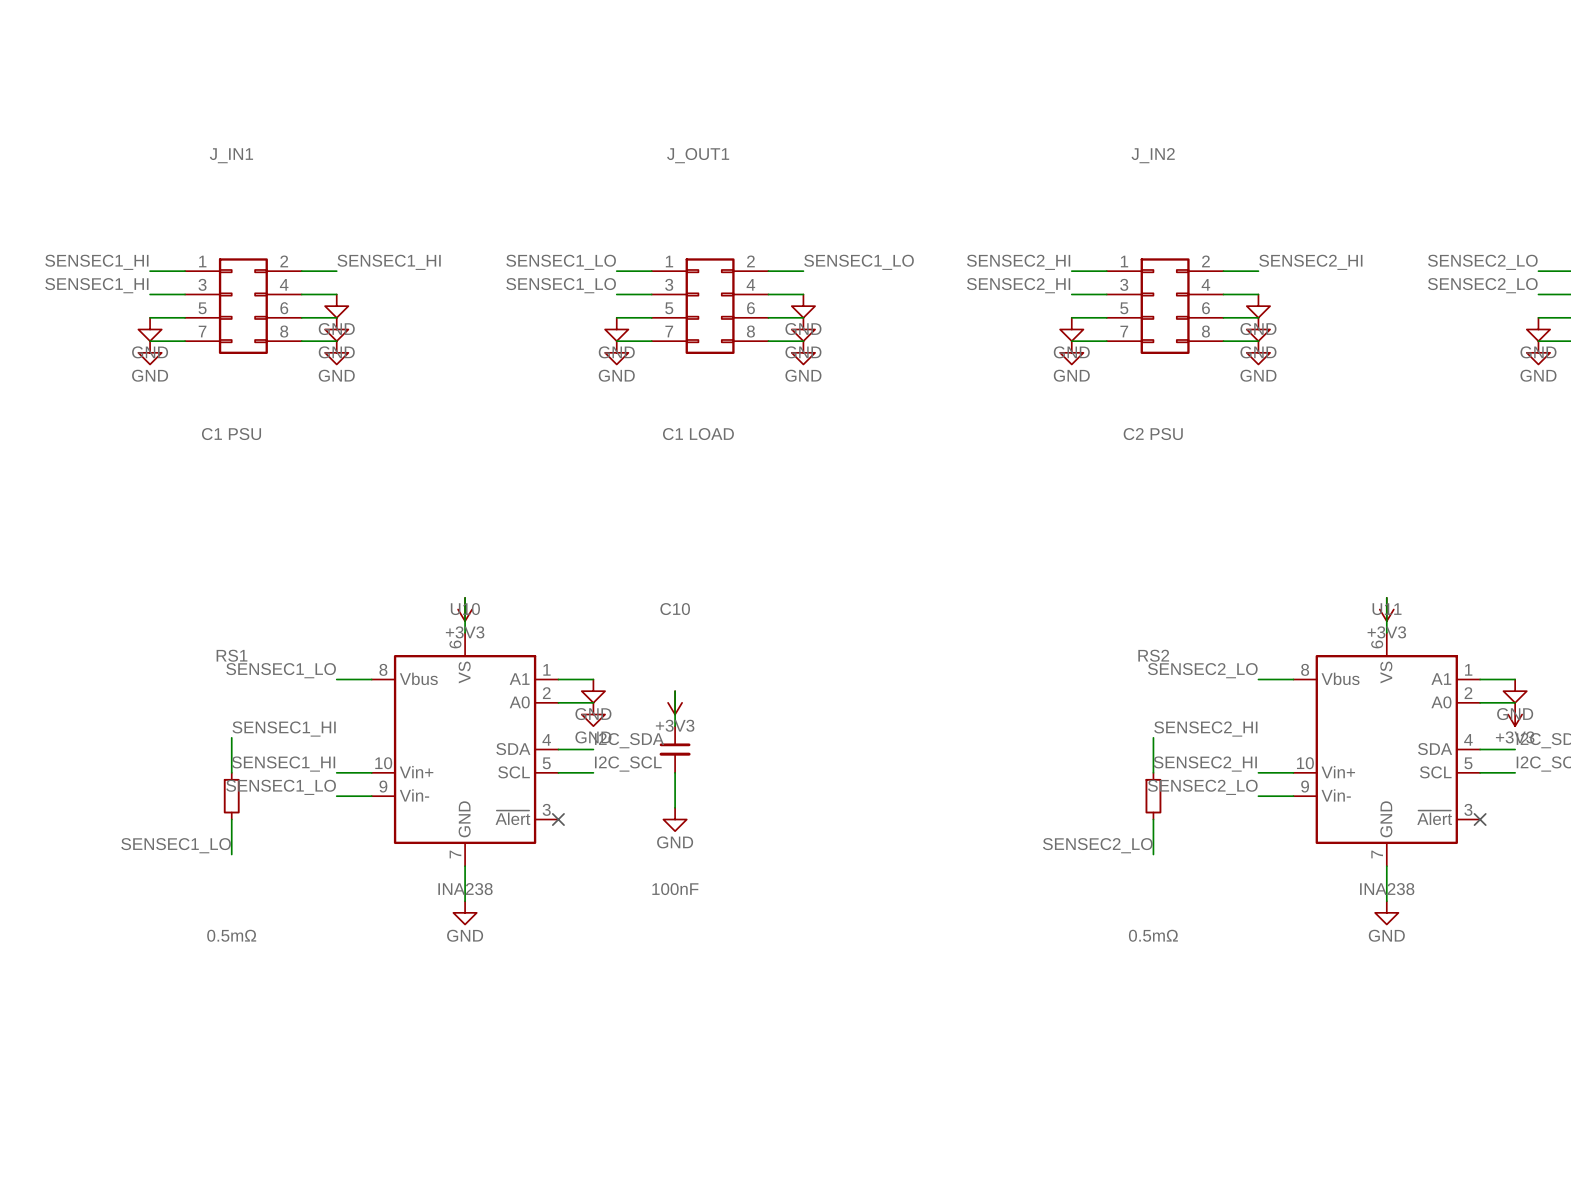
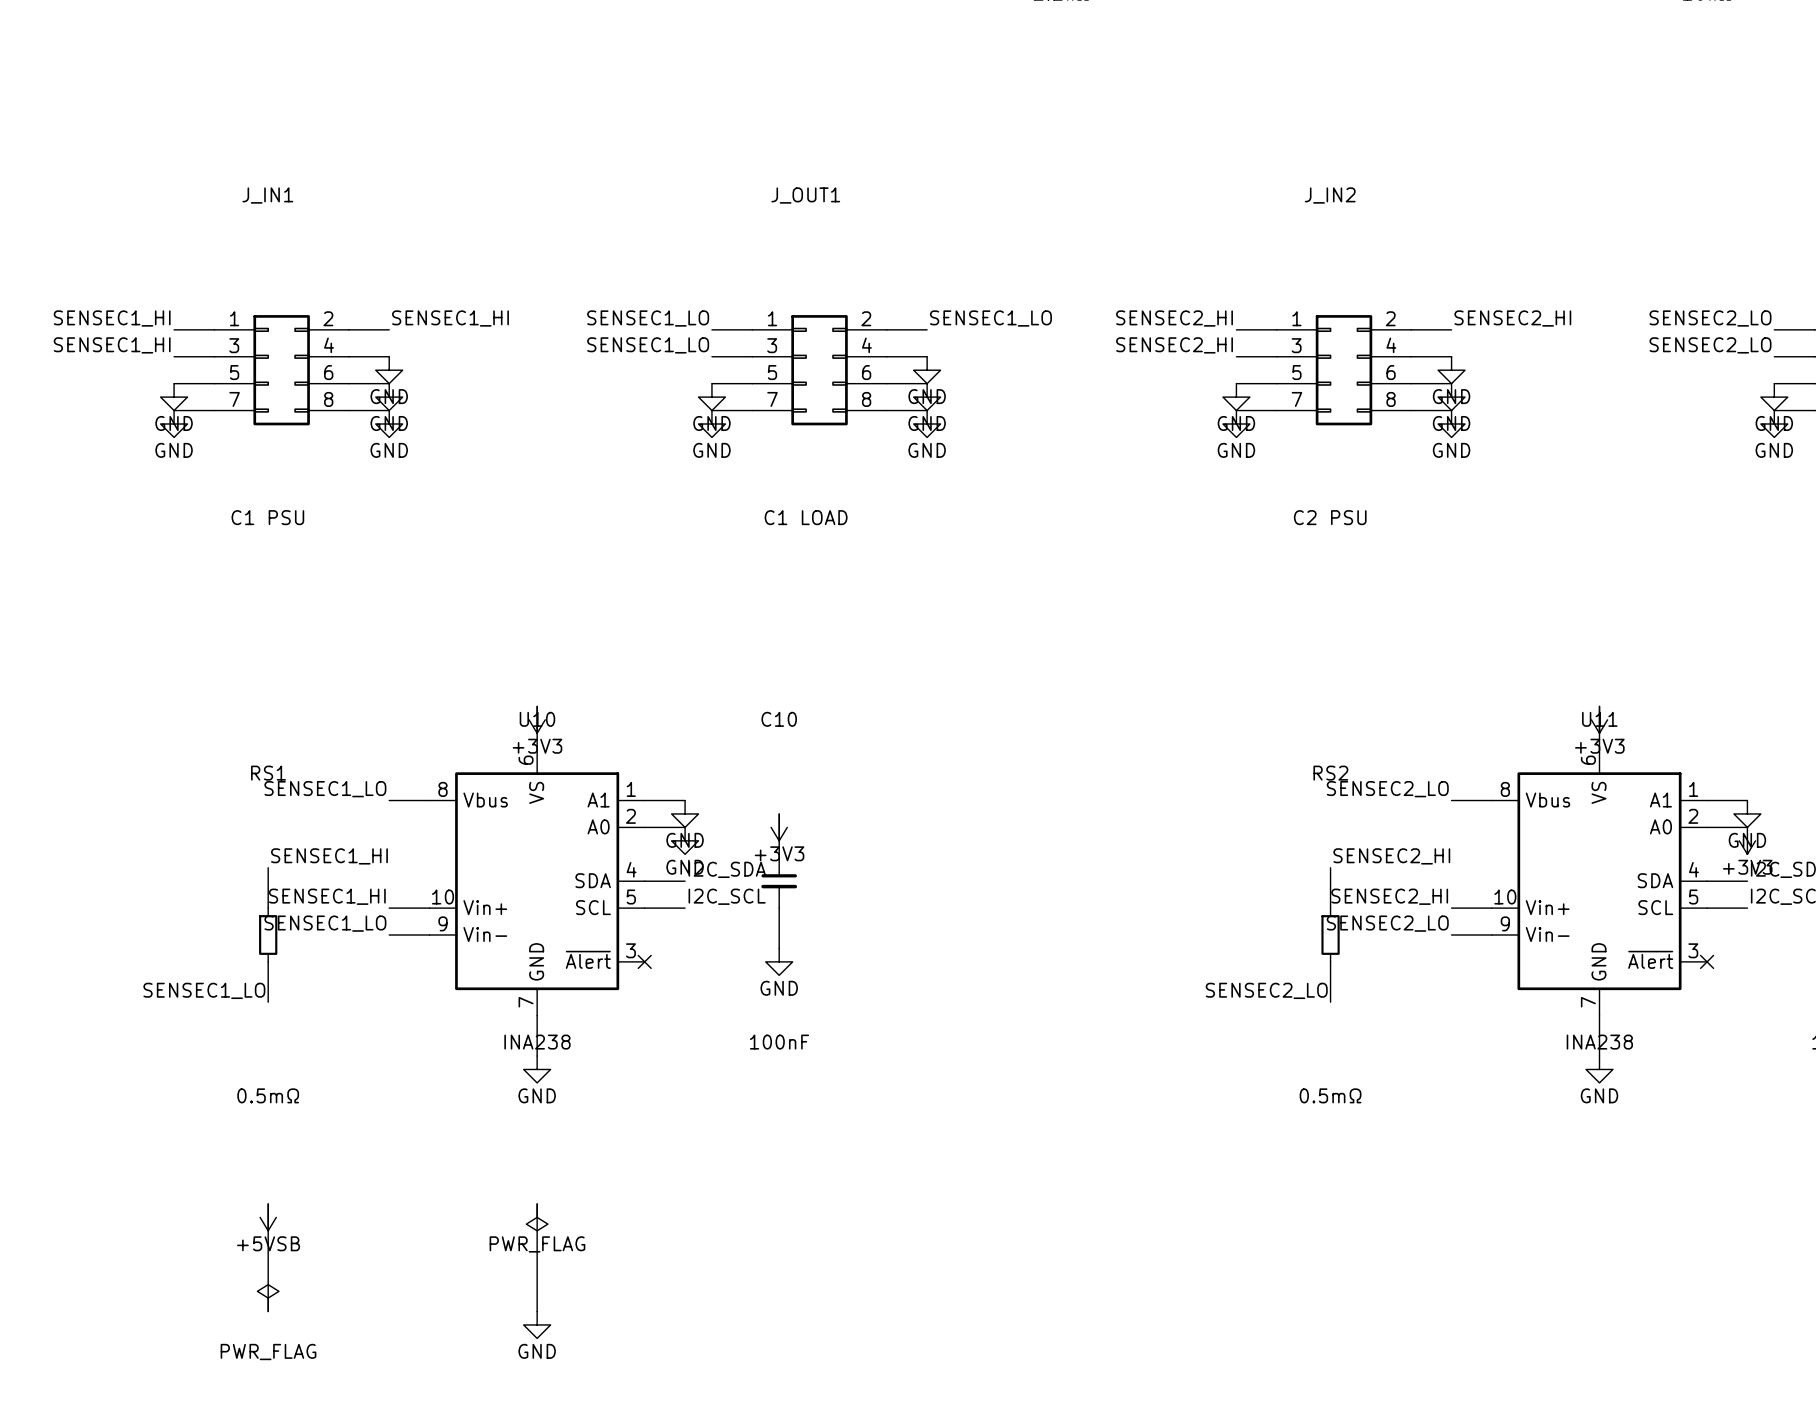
wire: none -> (268, 1203) (268, 1311)
wire: none -> (537, 1203) (537, 1311)
power symbol: none -> +5VSB (268, 1217)
power symbol: none -> PWR_FLAG (537, 1217)
power symbol: none -> PWR_FLAG (268, 1298)
power symbol: none -> GND (537, 1324)

